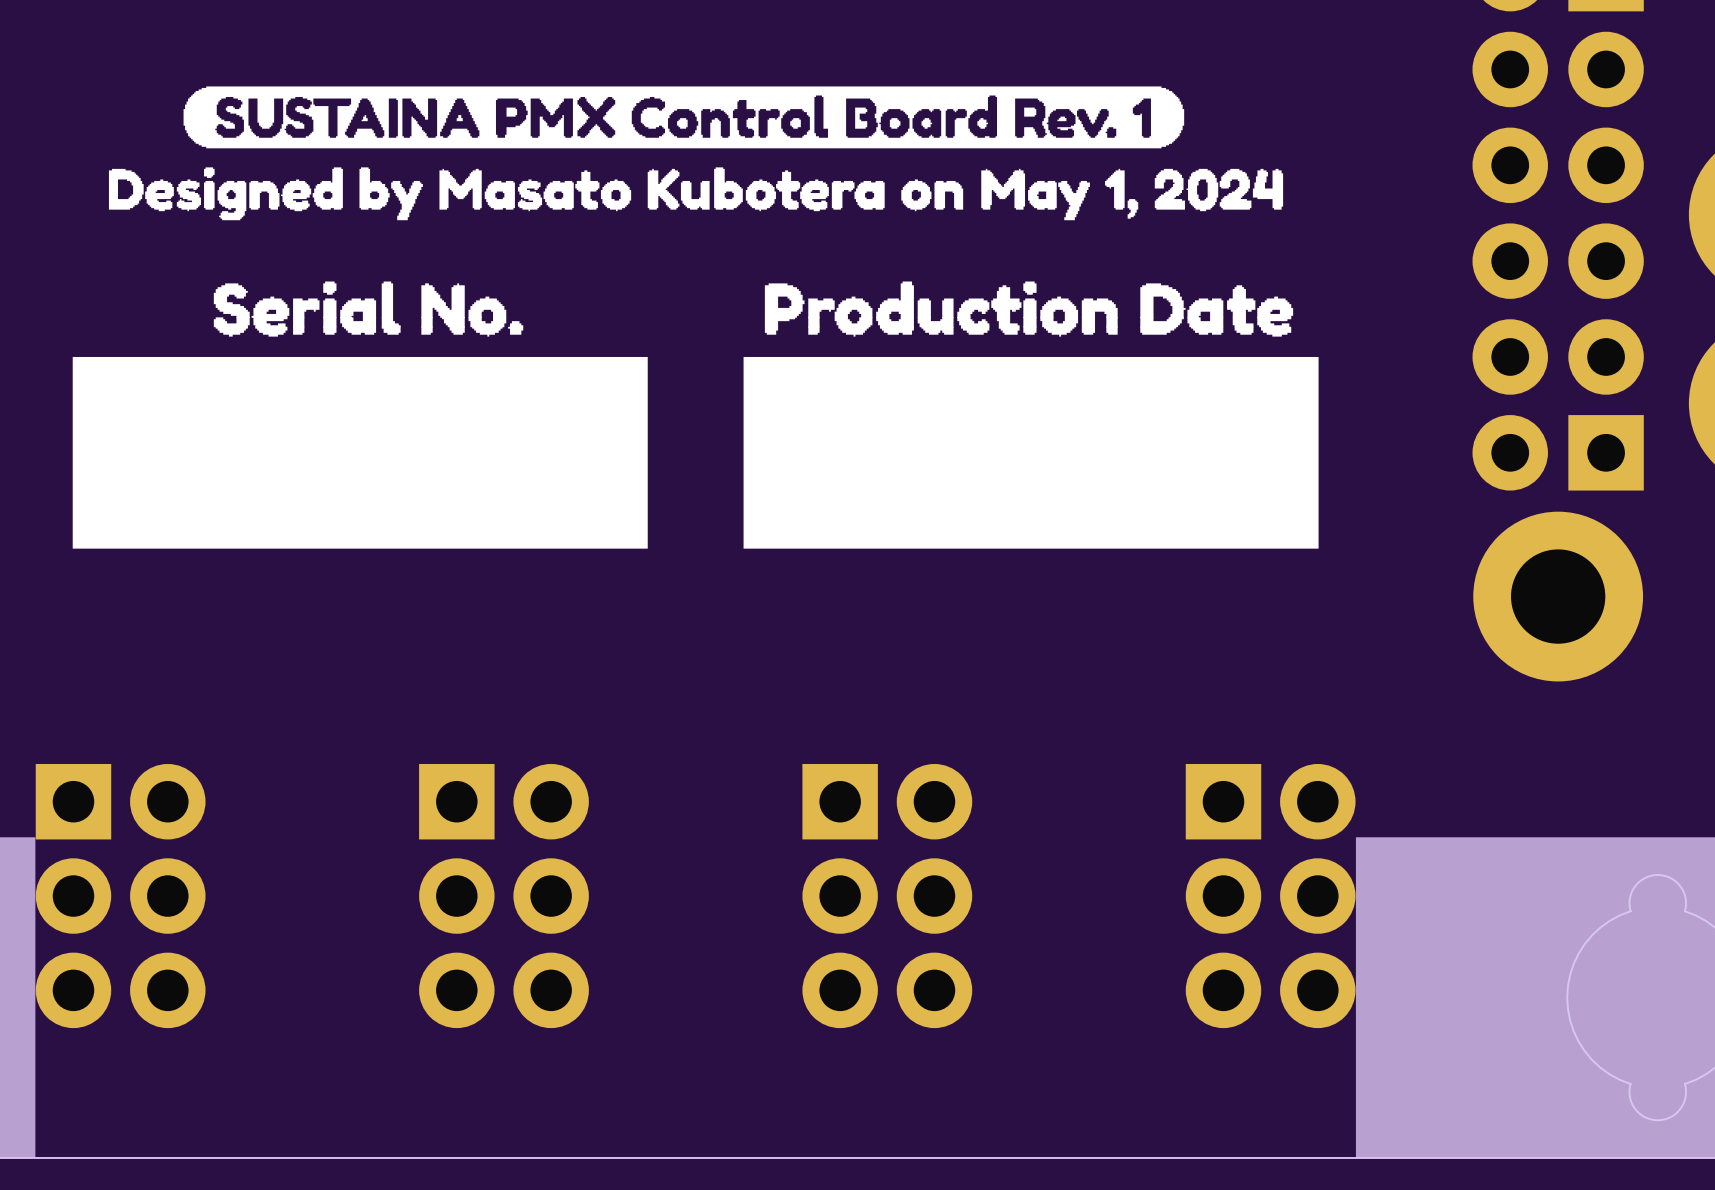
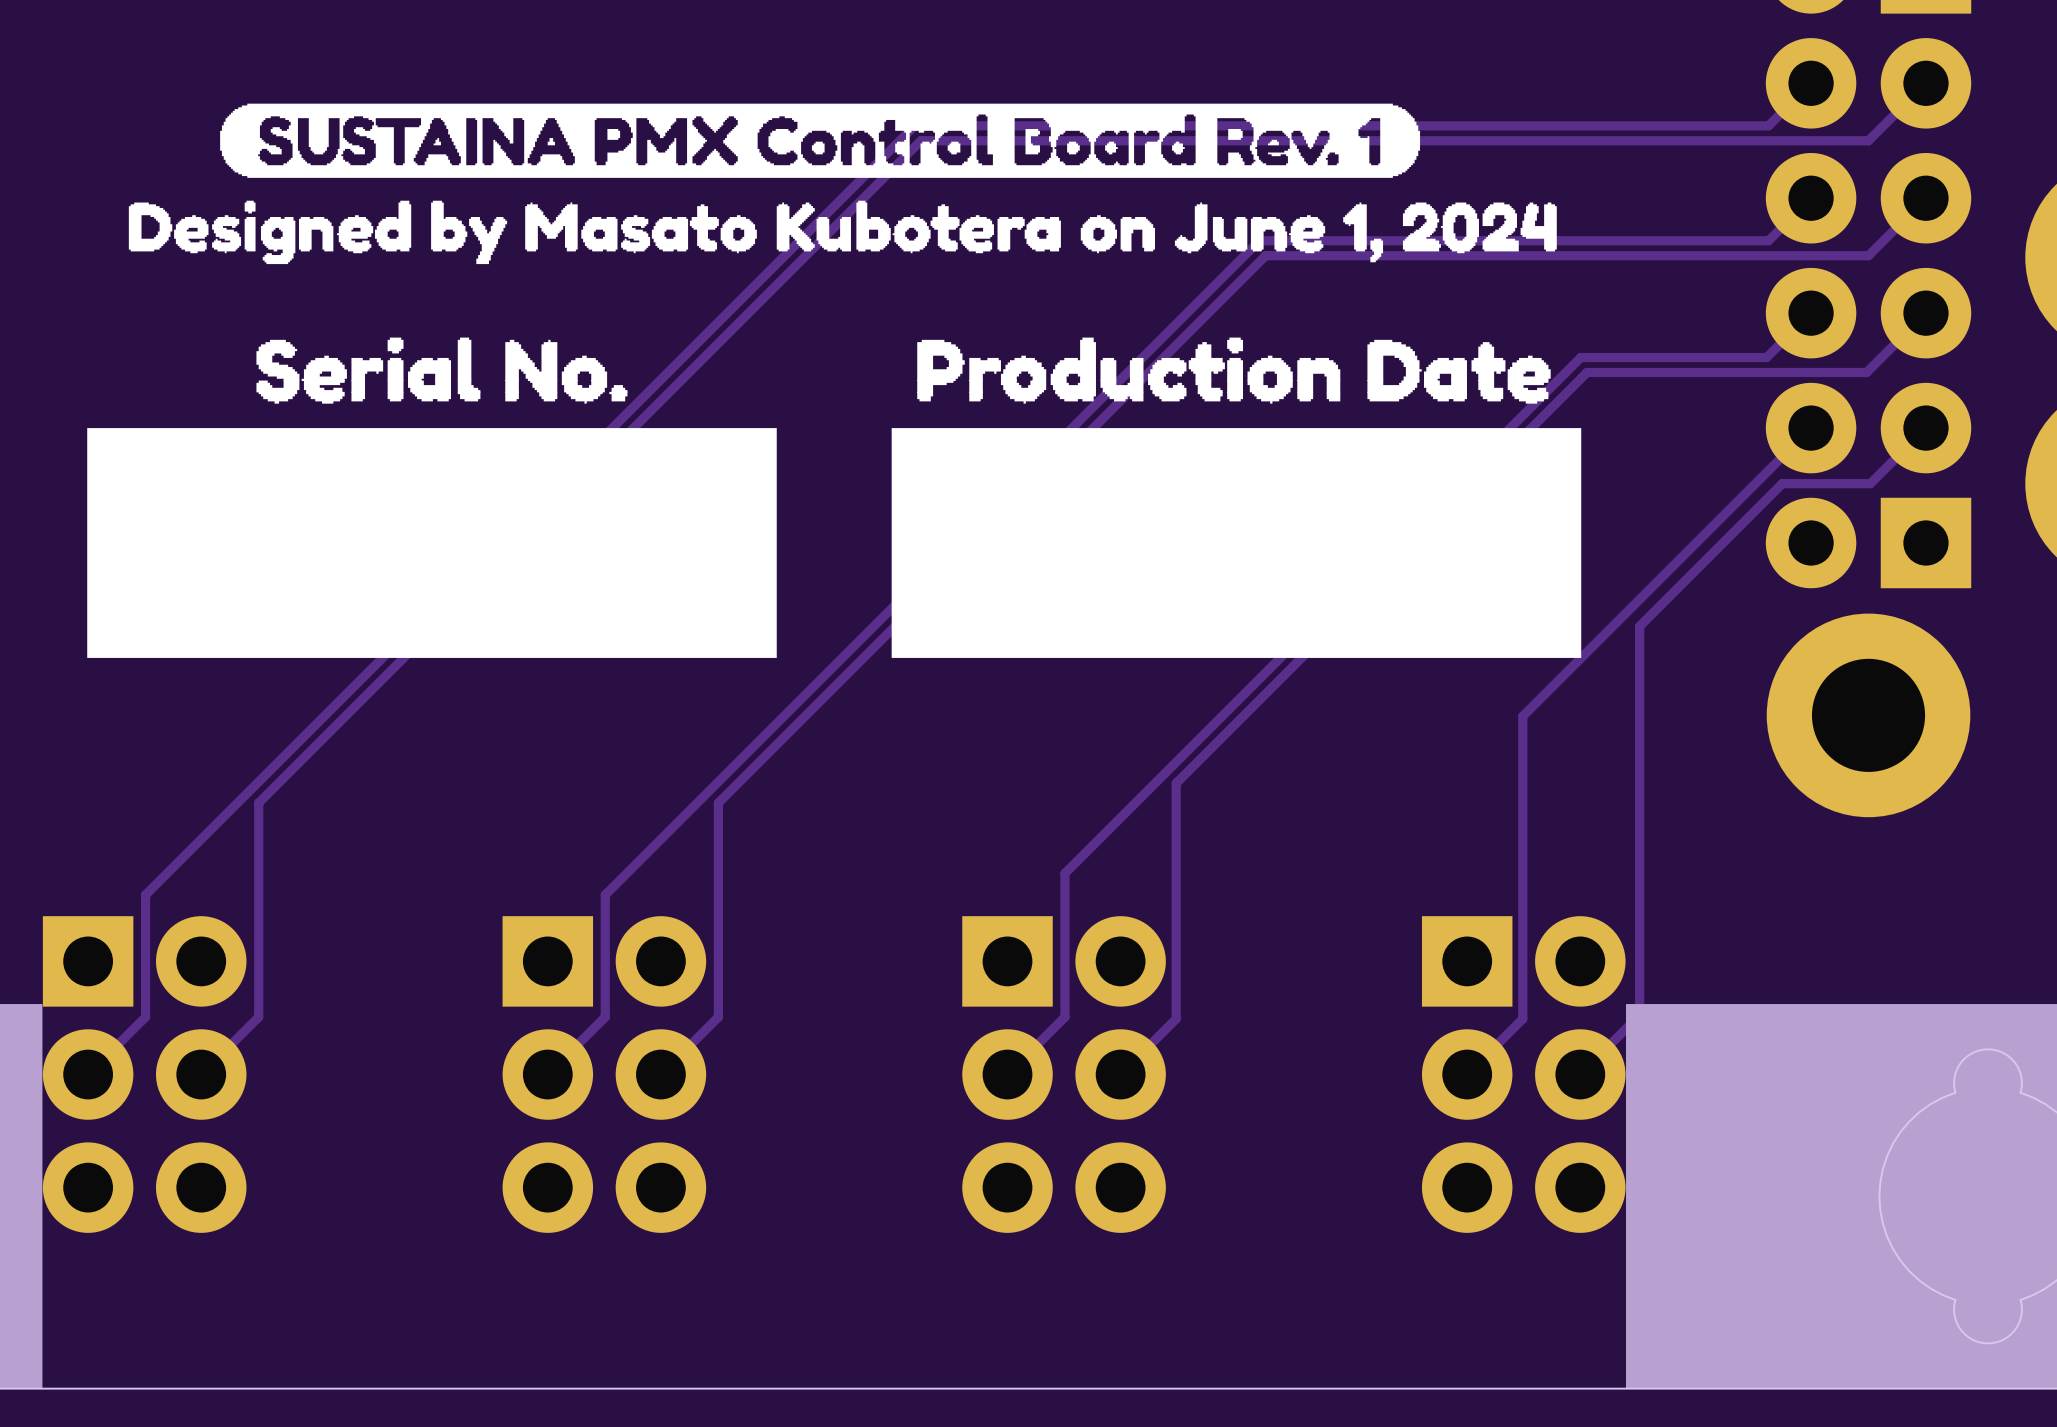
track: none -> (1811, 83) (1768, 125) (914, 125) (145, 894) (145, 1017) (88, 1074)
track: none -> (1925, 83) (1868, 140) (920, 140) (258, 802) (258, 1017) (201, 1074)
track: none -> (1811, 198) (1768, 240) (1259, 240) (605, 894) (605, 1017) (547, 1074)
track: none -> (1925, 198) (1868, 255) (1265, 255) (718, 802) (718, 1017) (660, 1074)
drawing shape: [108, 167, 1284, 221] -> [128, 200, 1557, 265]
track: none -> (1811, 313) (1766, 357) (1580, 357) (1064, 873) (1064, 1017) (1007, 1074)
track: none -> (1925, 313) (1866, 372) (1587, 372) (1176, 783) (1176, 1018) (1120, 1074)
track: none -> (1811, 428) (1522, 716) (1522, 1018) (1467, 1074)
track: none -> (1925, 428) (1870, 483) (1782, 483) (1639, 626) (1639, 1015) (1580, 1074)

